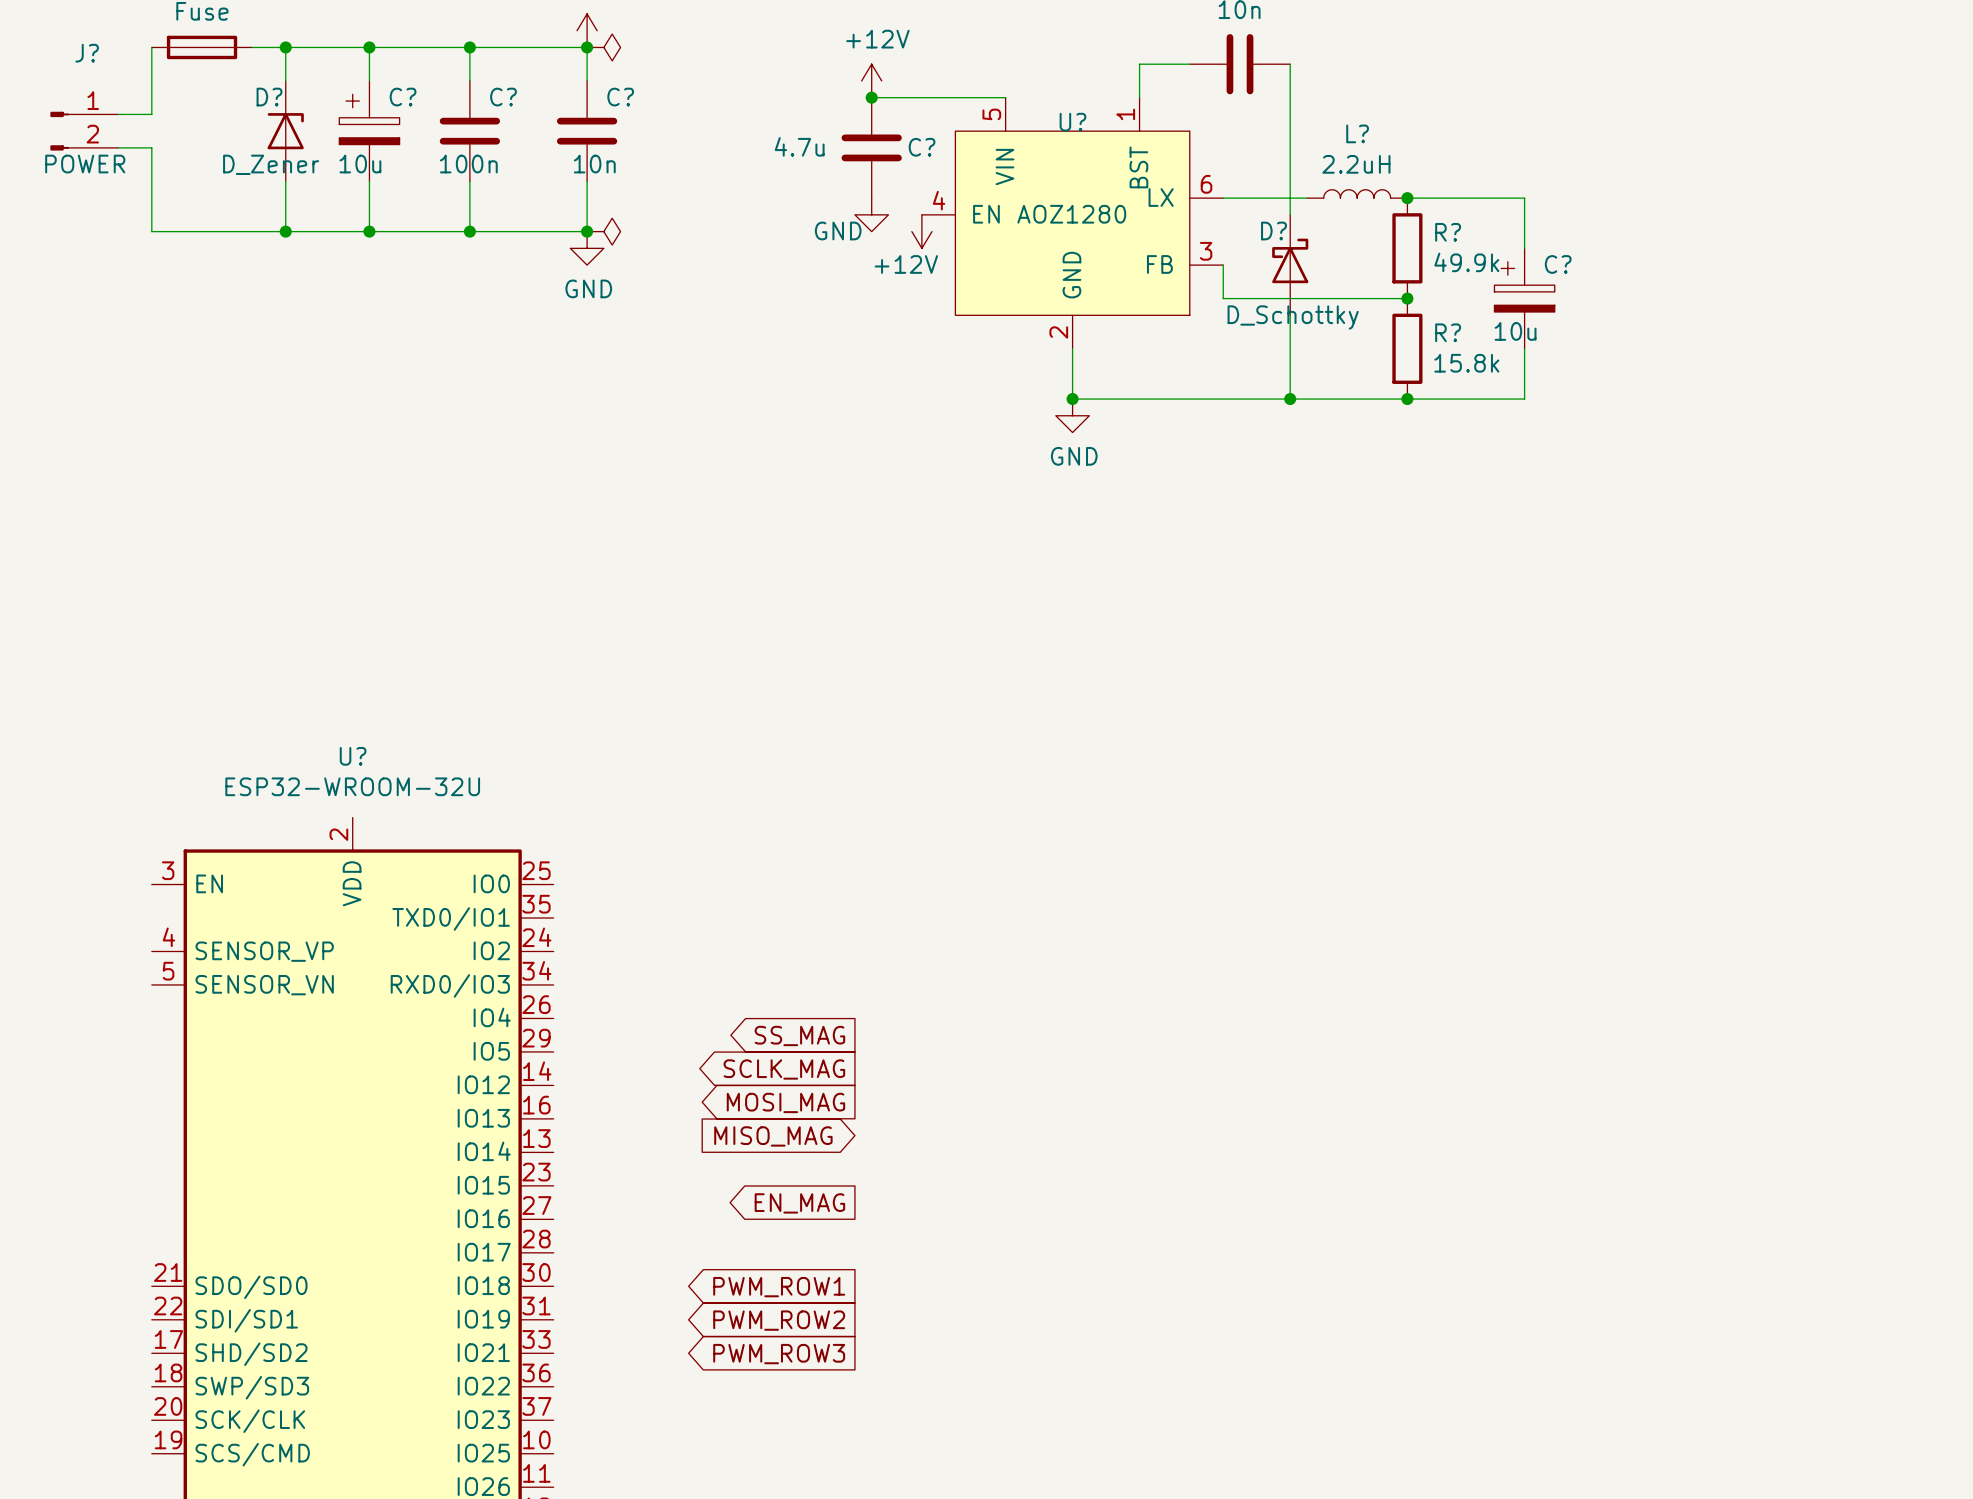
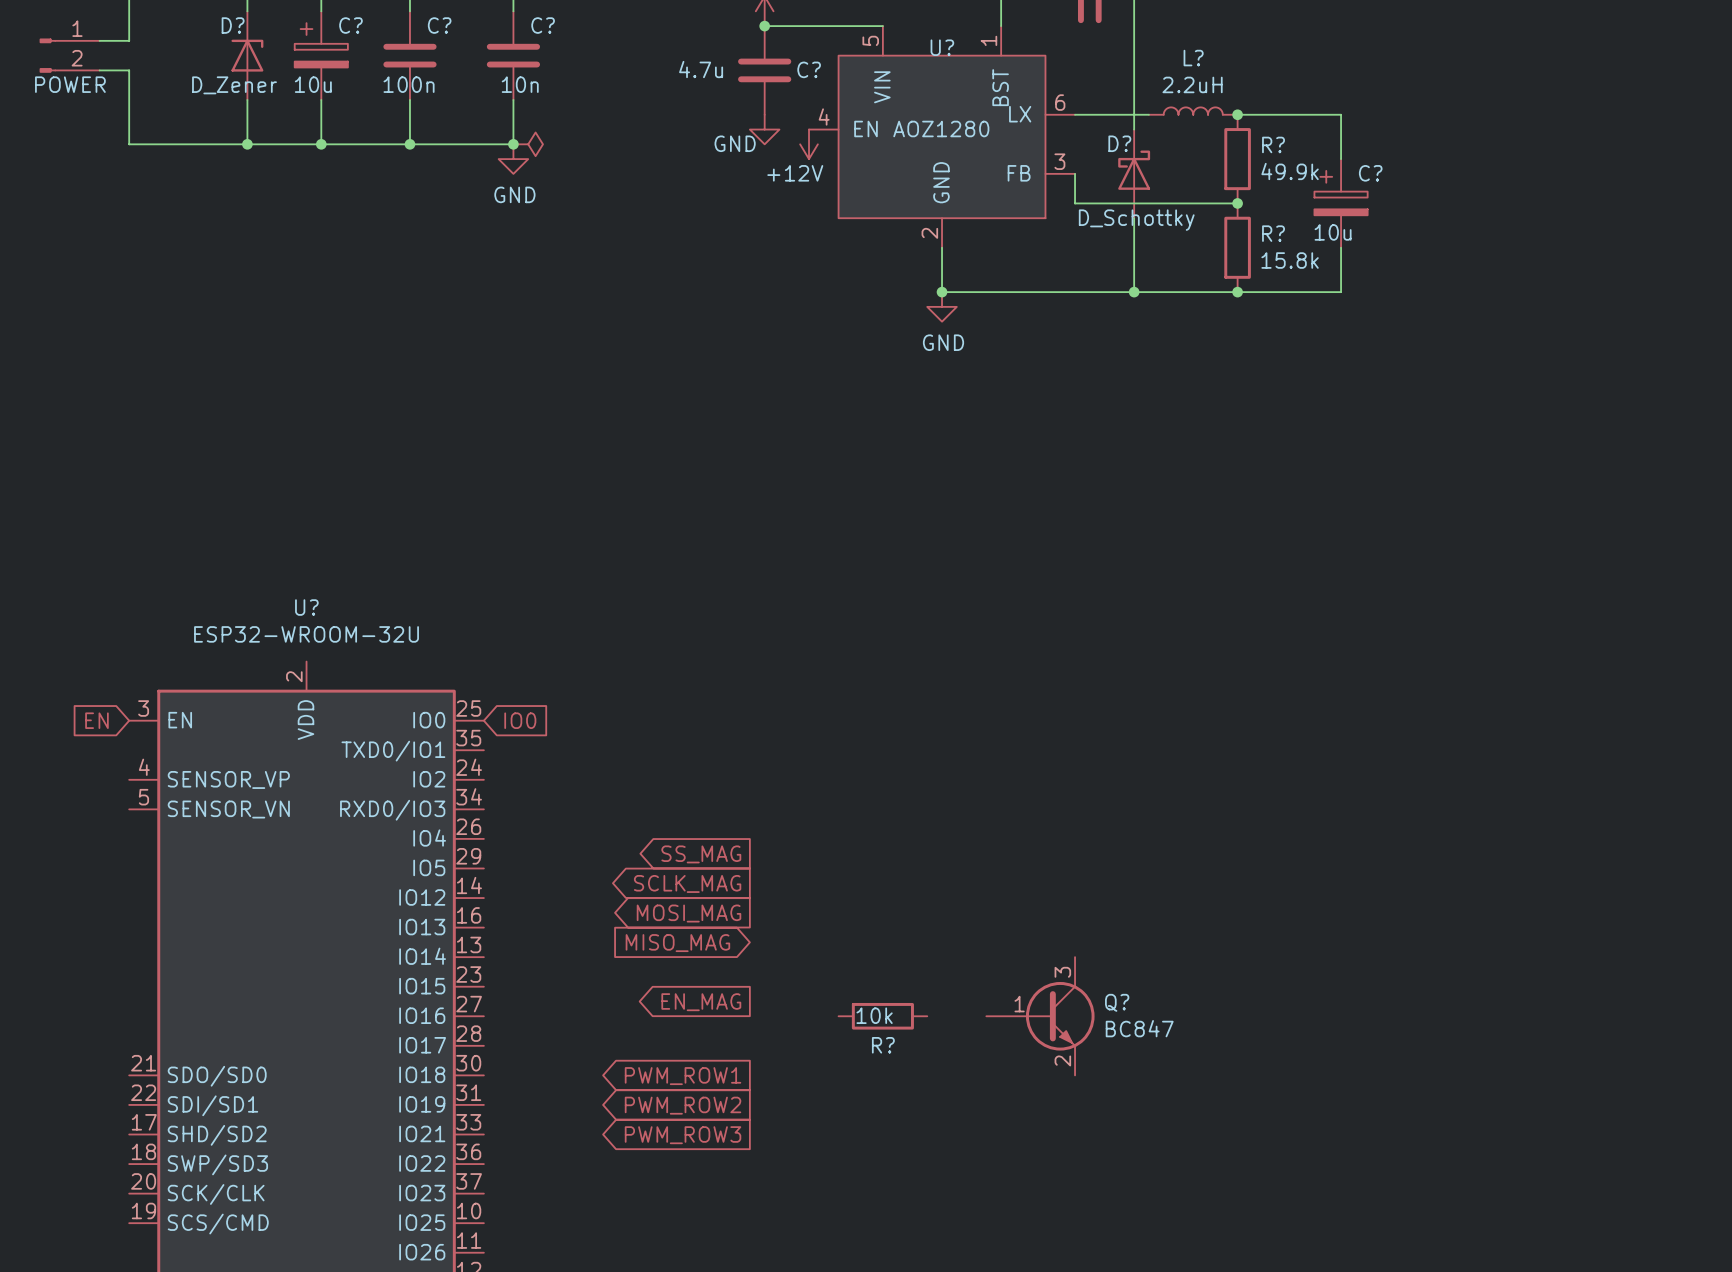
global label: none -> EN (96, 720)
global label: none -> IO0 (520, 720)
R?: none -> 10k (882, 1016)
Q?: none -> BC847 (1040, 1016)

